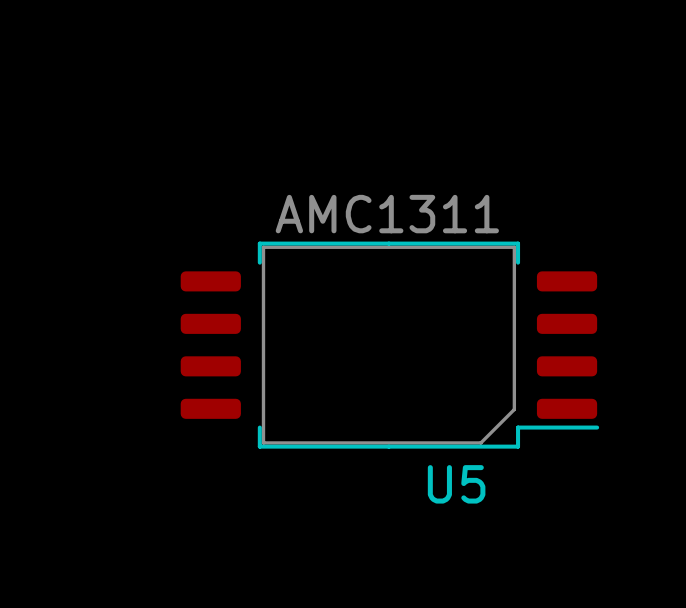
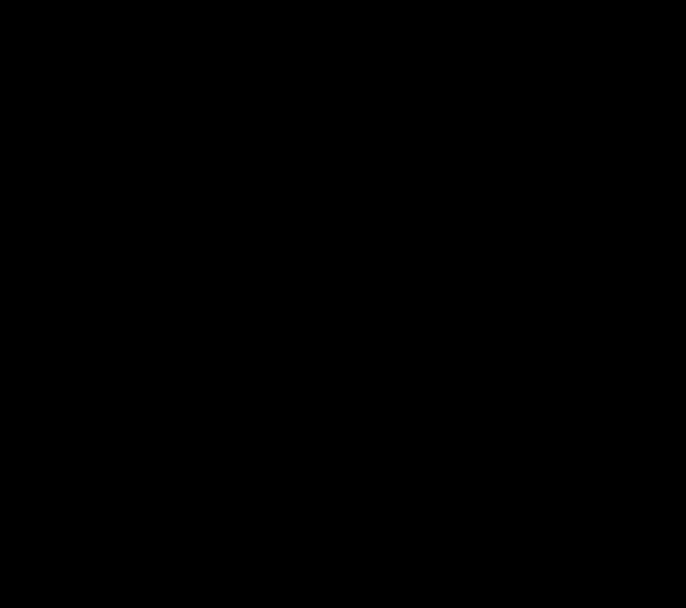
U5: AMC1311 (389, 345) -> none

